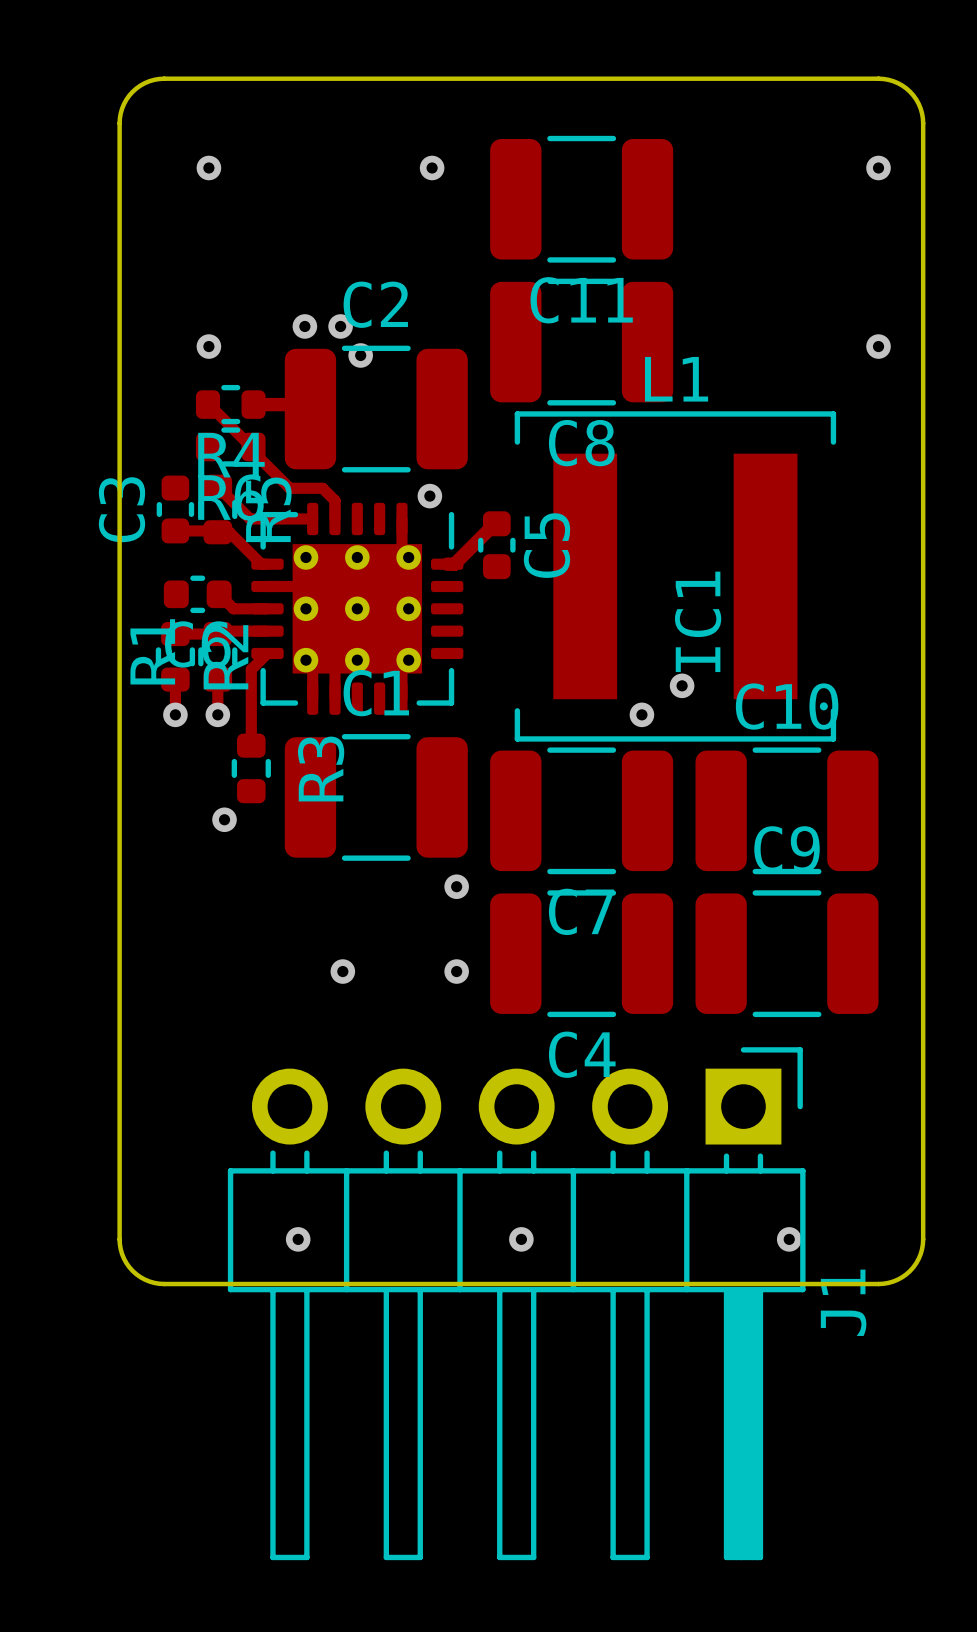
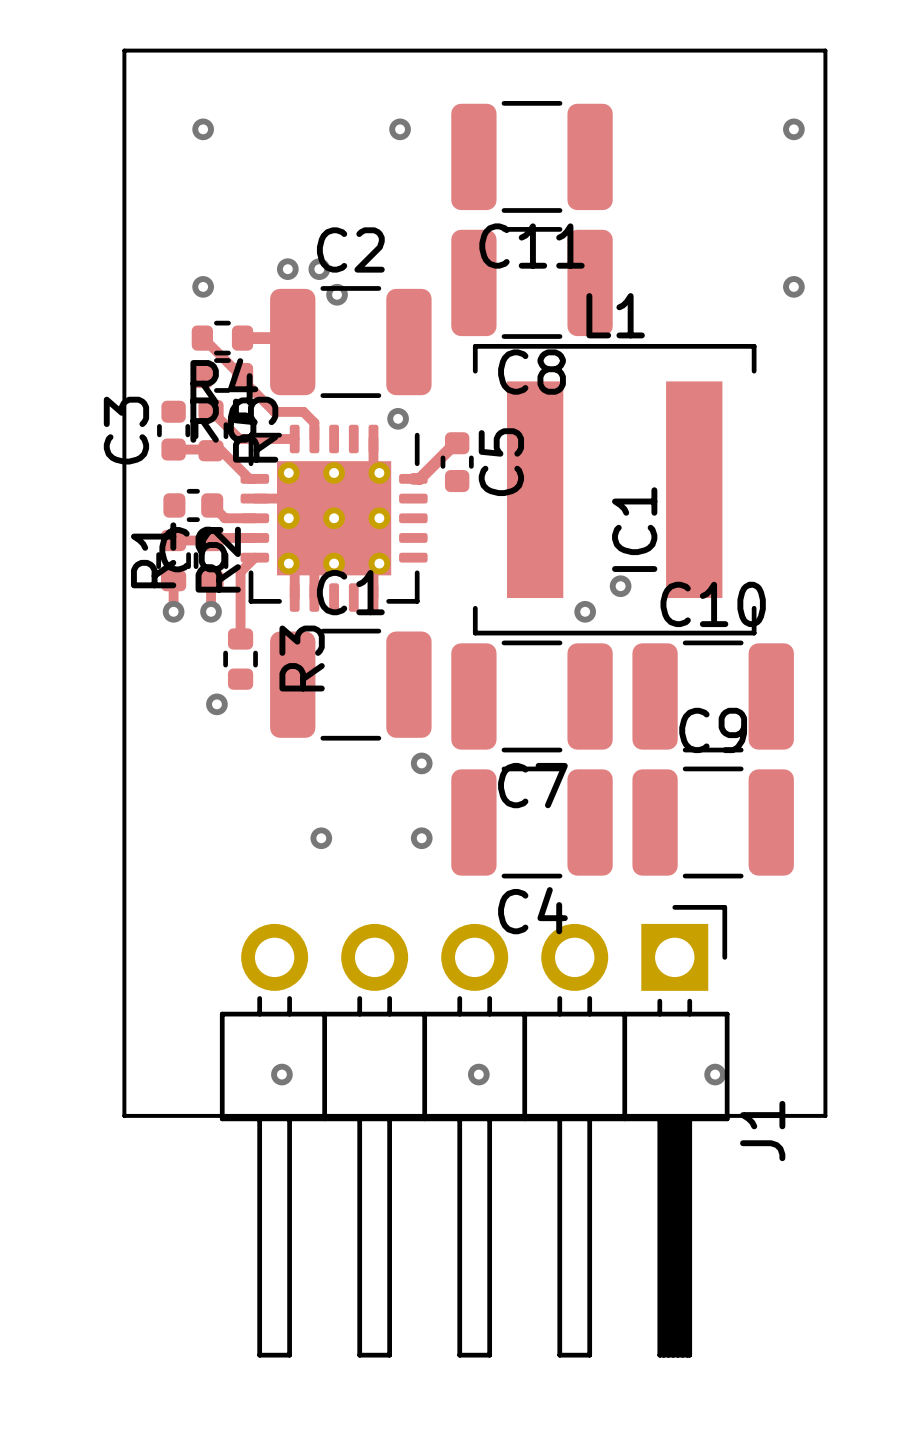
board edge: (164, 78) (144, 83) (132, 91) (122, 108) (119, 123) -> (163, 50) (124, 50) (124, 89)
board edge: (878, 78) (893, 81) (910, 91) (918, 103) (923, 123) (923, 1239) (920, 1254) (916, 1263) (910, 1270) (897, 1279) (878, 1284) (164, 1284) (149, 1281) (132, 1270) (124, 1258) (119, 1239) -> (793, 50) (825, 50) (825, 1115) (124, 1115) (124, 1074)

